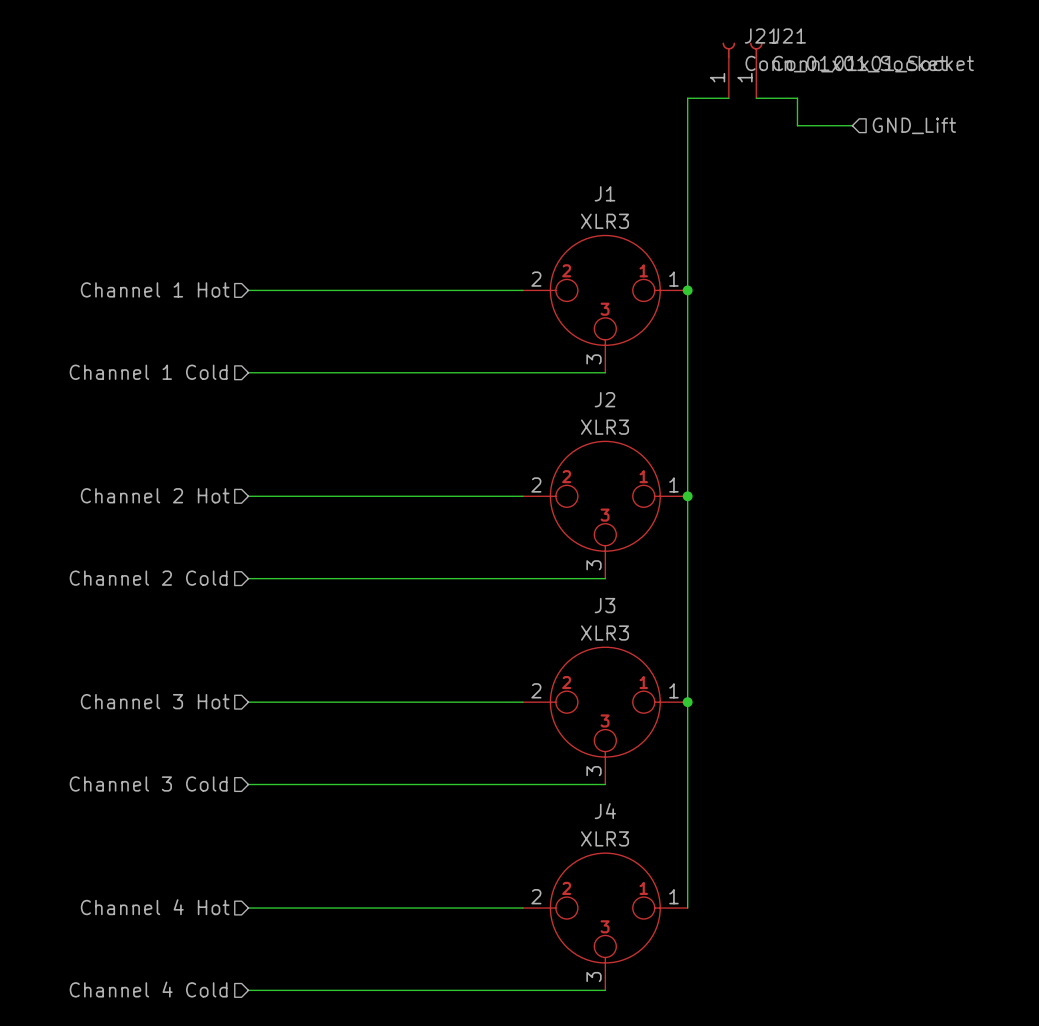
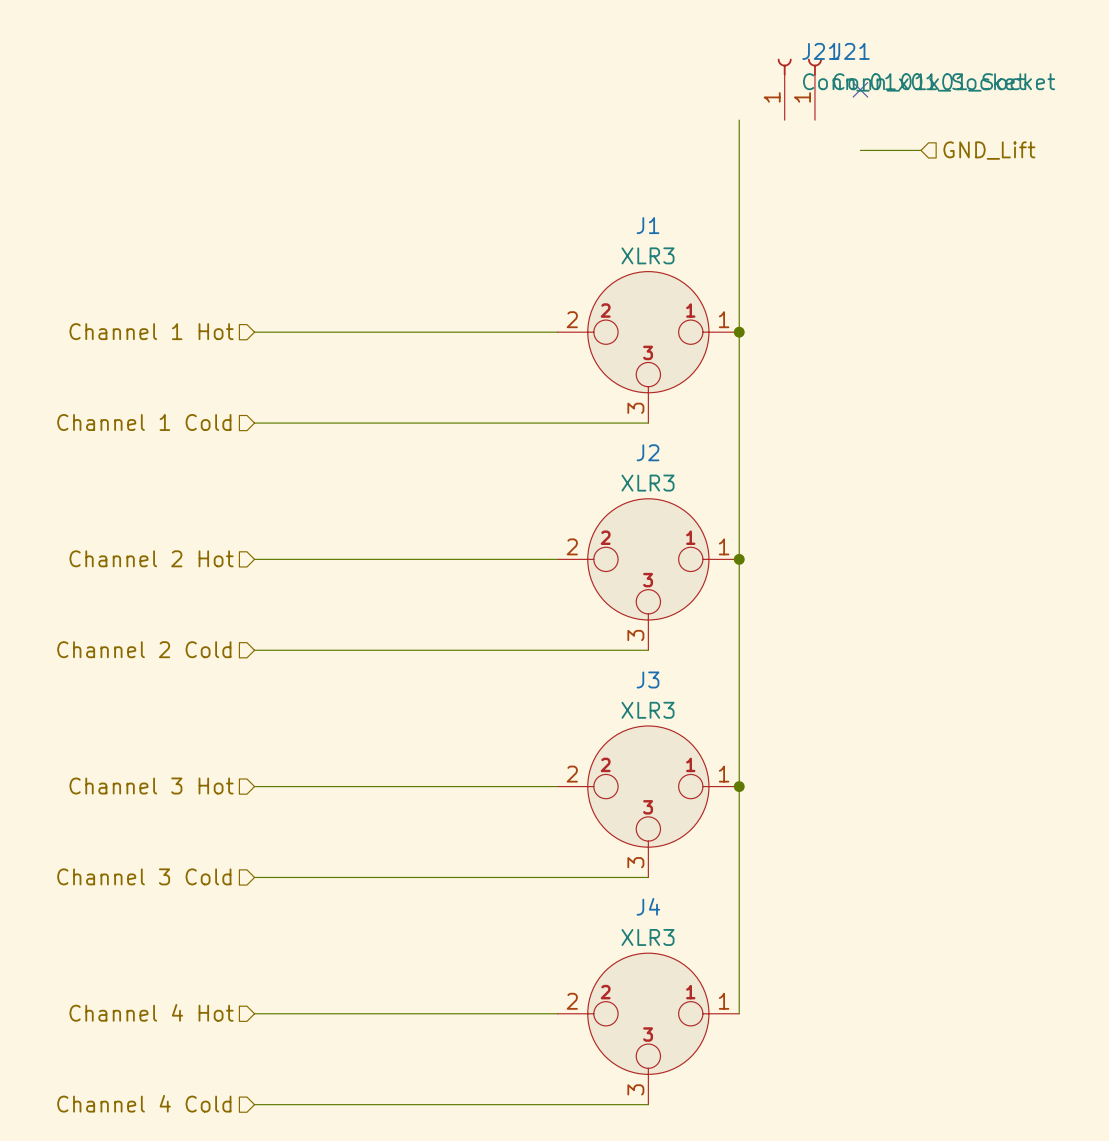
no-connect mark: none -> (860, 89)
wire: (687, 98) (728, 98) -> none
wire: (756, 98) (797, 98) (797, 125) -> none

